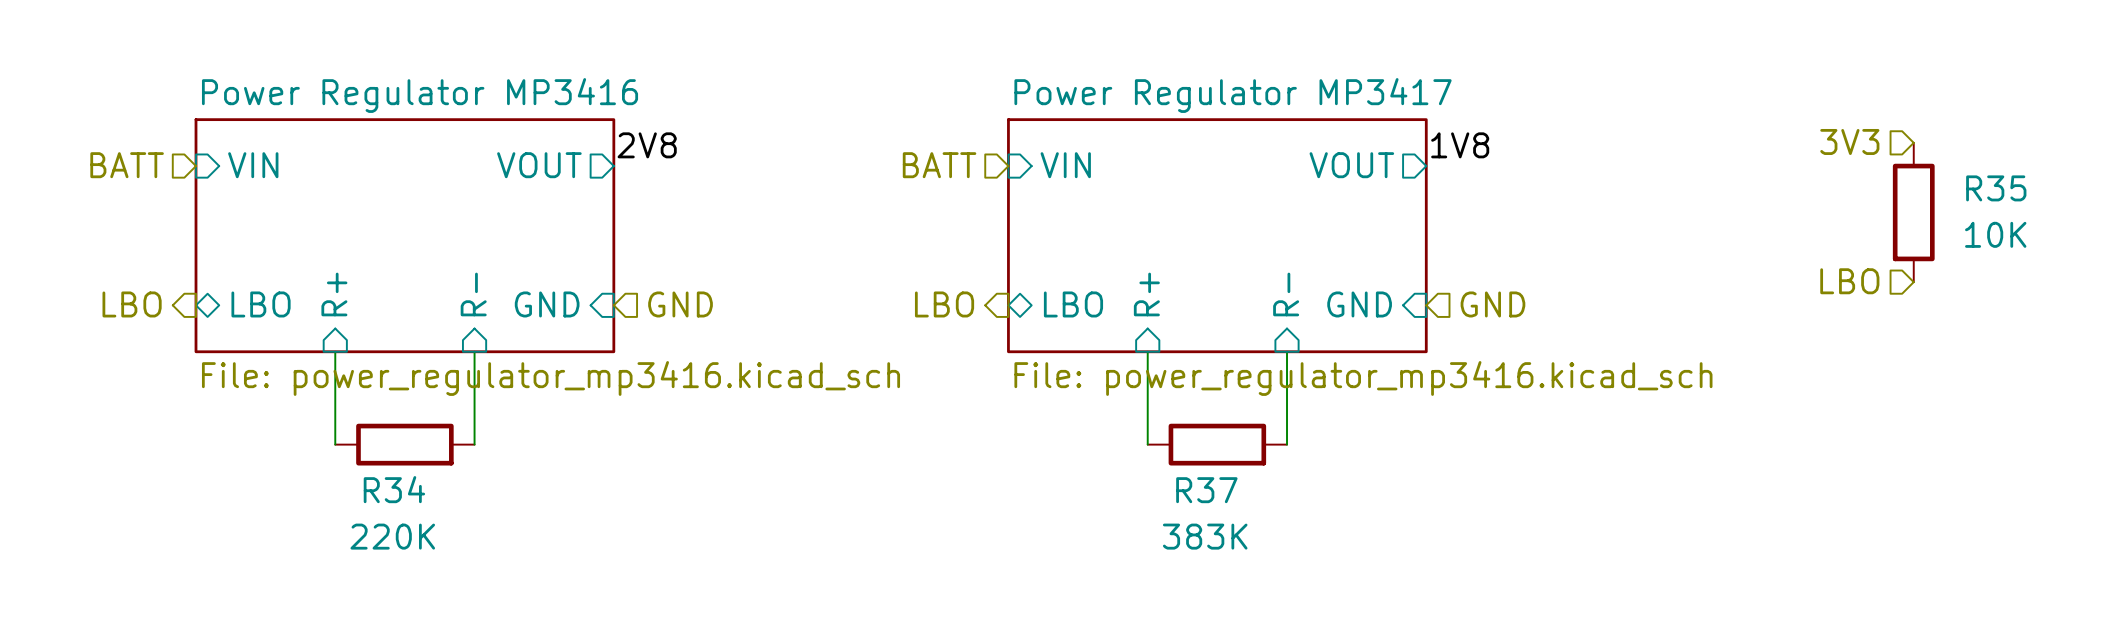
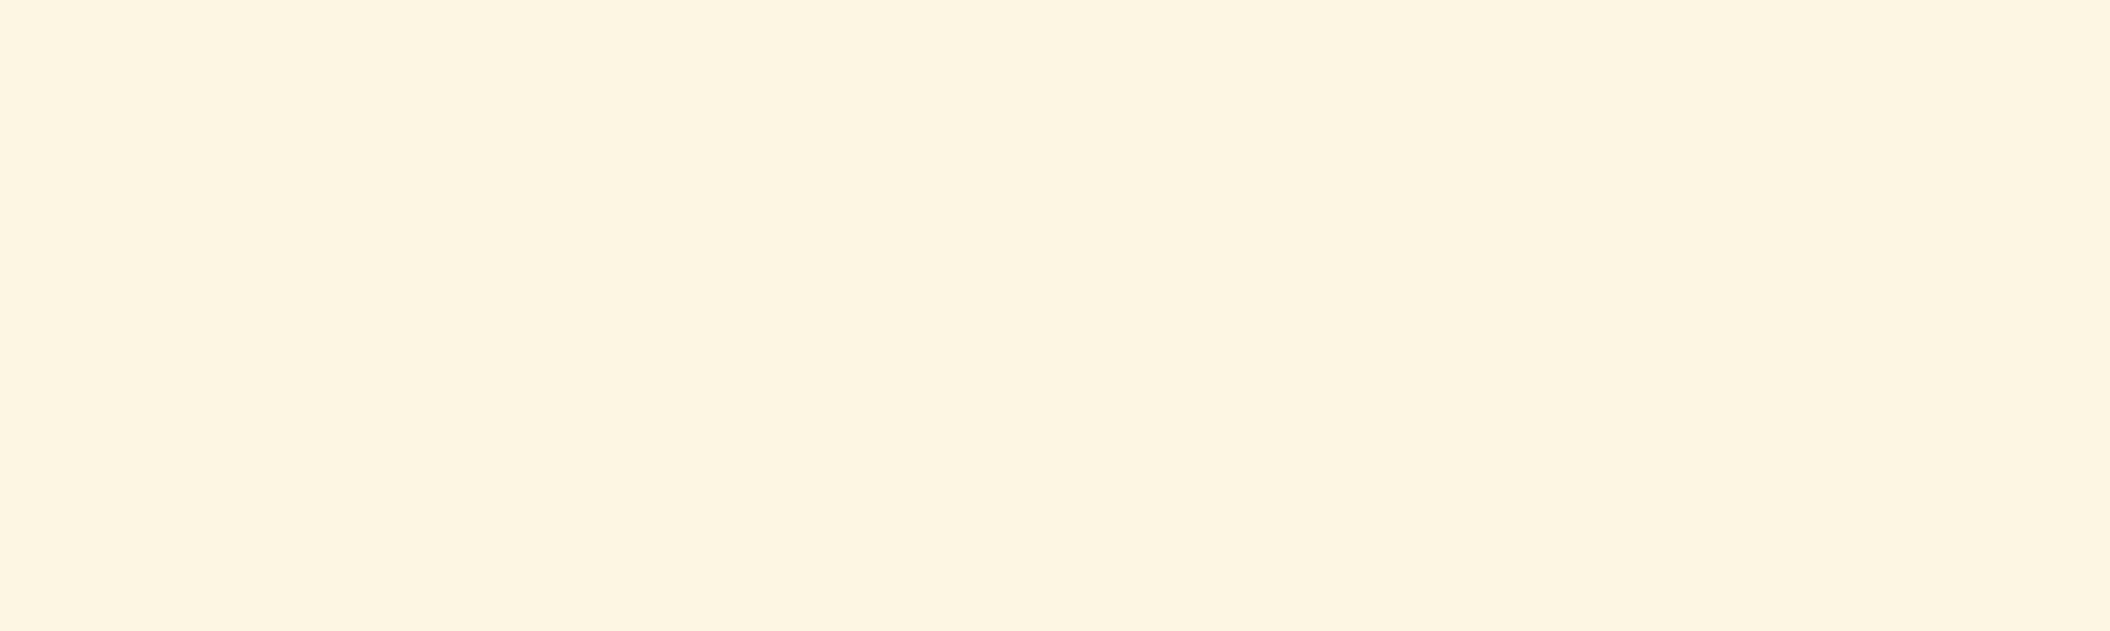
hierarchical label: 3V3 (1849, 141) -> none
label: 2V8 (647, 145) -> none
label: 1V8 (1460, 145) -> none
hierarchical label: BATT (127, 165) -> none
sheet pin: VIN (253, 165) -> none
sheet pin: VOUT (539, 165) -> none
hierarchical label: BATT (939, 165) -> none
sheet pin: VIN (1065, 165) -> none
sheet pin: VOUT (1351, 165) -> none
R35: 10K (1913, 212) -> none
sheet Power Regulator MP3416: File: power_regulator_mp3416.kicad_sch (404, 235) -> none
sheet Power Regulator MP3417: File: power_regulator_mp3416.kicad_sch (1217, 235) -> none
hierarchical label: LBO (1849, 281) -> none
sheet pin: R+ (334, 294) -> none
sheet pin: R- (473, 294) -> none
sheet pin: R+ (1146, 294) -> none
sheet pin: R- (1286, 294) -> none
hierarchical label: LBO (132, 304) -> none
sheet pin: LBO (261, 304) -> none
sheet pin: GND (547, 304) -> none
hierarchical label: GND (680, 304) -> none
hierarchical label: LBO (944, 304) -> none
sheet pin: LBO (1073, 304) -> none
sheet pin: GND (1359, 304) -> none
hierarchical label: GND (1492, 304) -> none
wire: (335, 351) (335, 444) -> none
wire: (474, 351) (474, 444) -> none
wire: (1147, 351) (1147, 444) -> none
wire: (1287, 351) (1287, 444) -> none
R34: 220K (404, 444) -> none
R37: 383K (1217, 444) -> none

